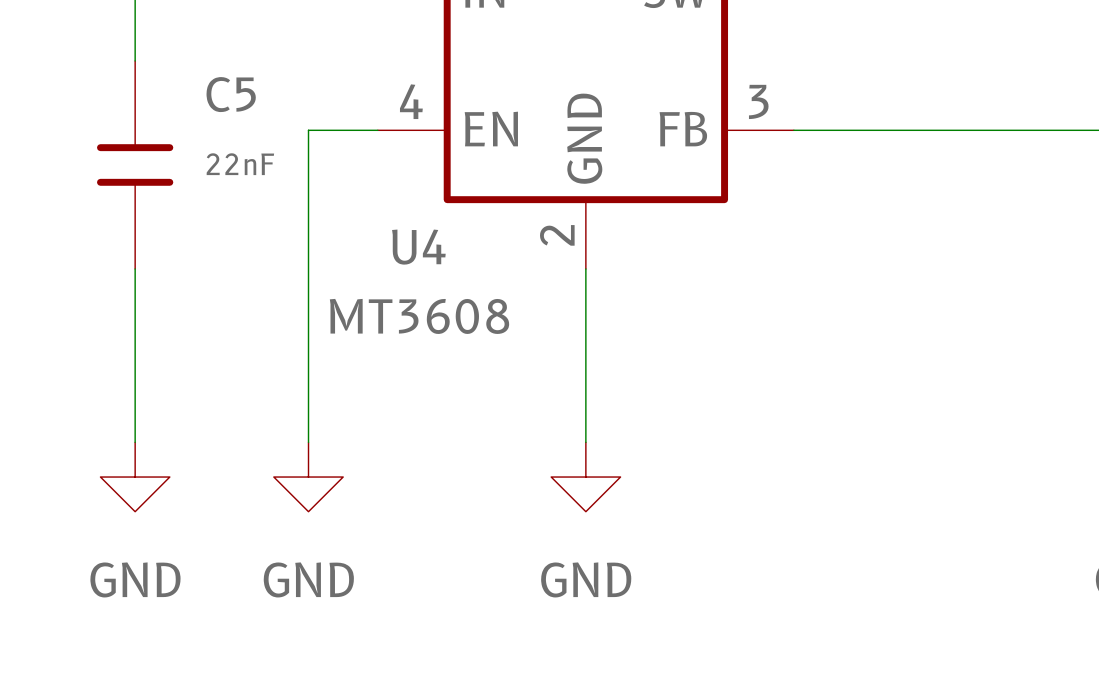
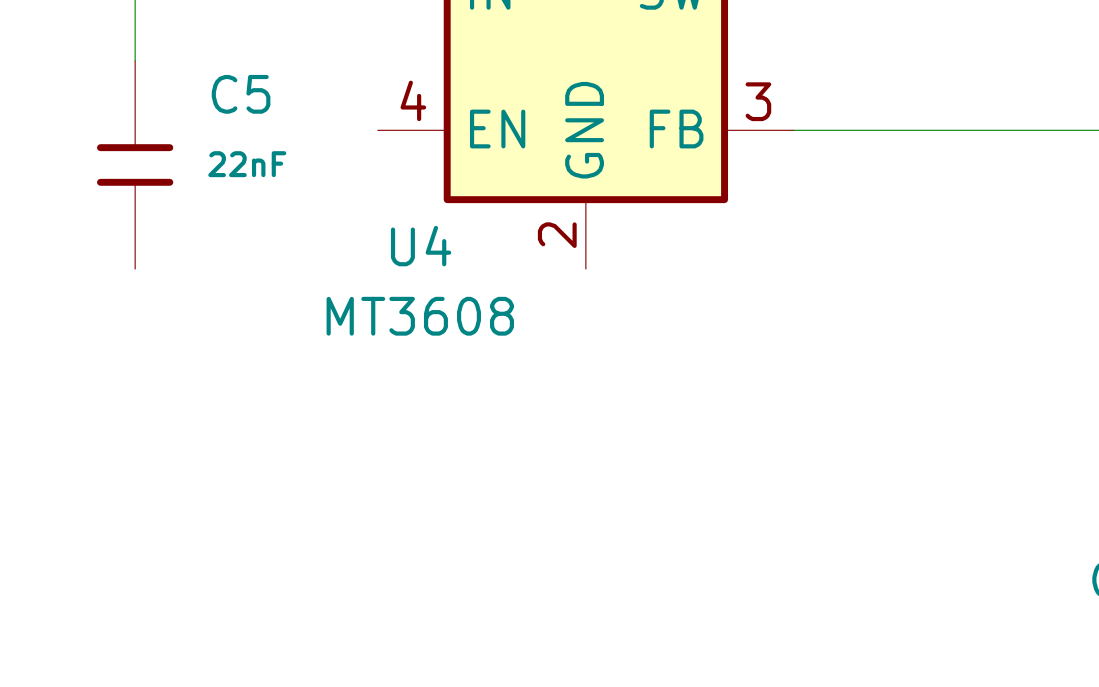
wire: (377, 130) (308, 130) (308, 442) -> none
wire: (135, 268) (135, 442) -> none
wire: (585, 268) (585, 442) -> none
power symbol: GND (135, 477) -> none
power symbol: GND (308, 477) -> none
power symbol: GND (585, 477) -> none

